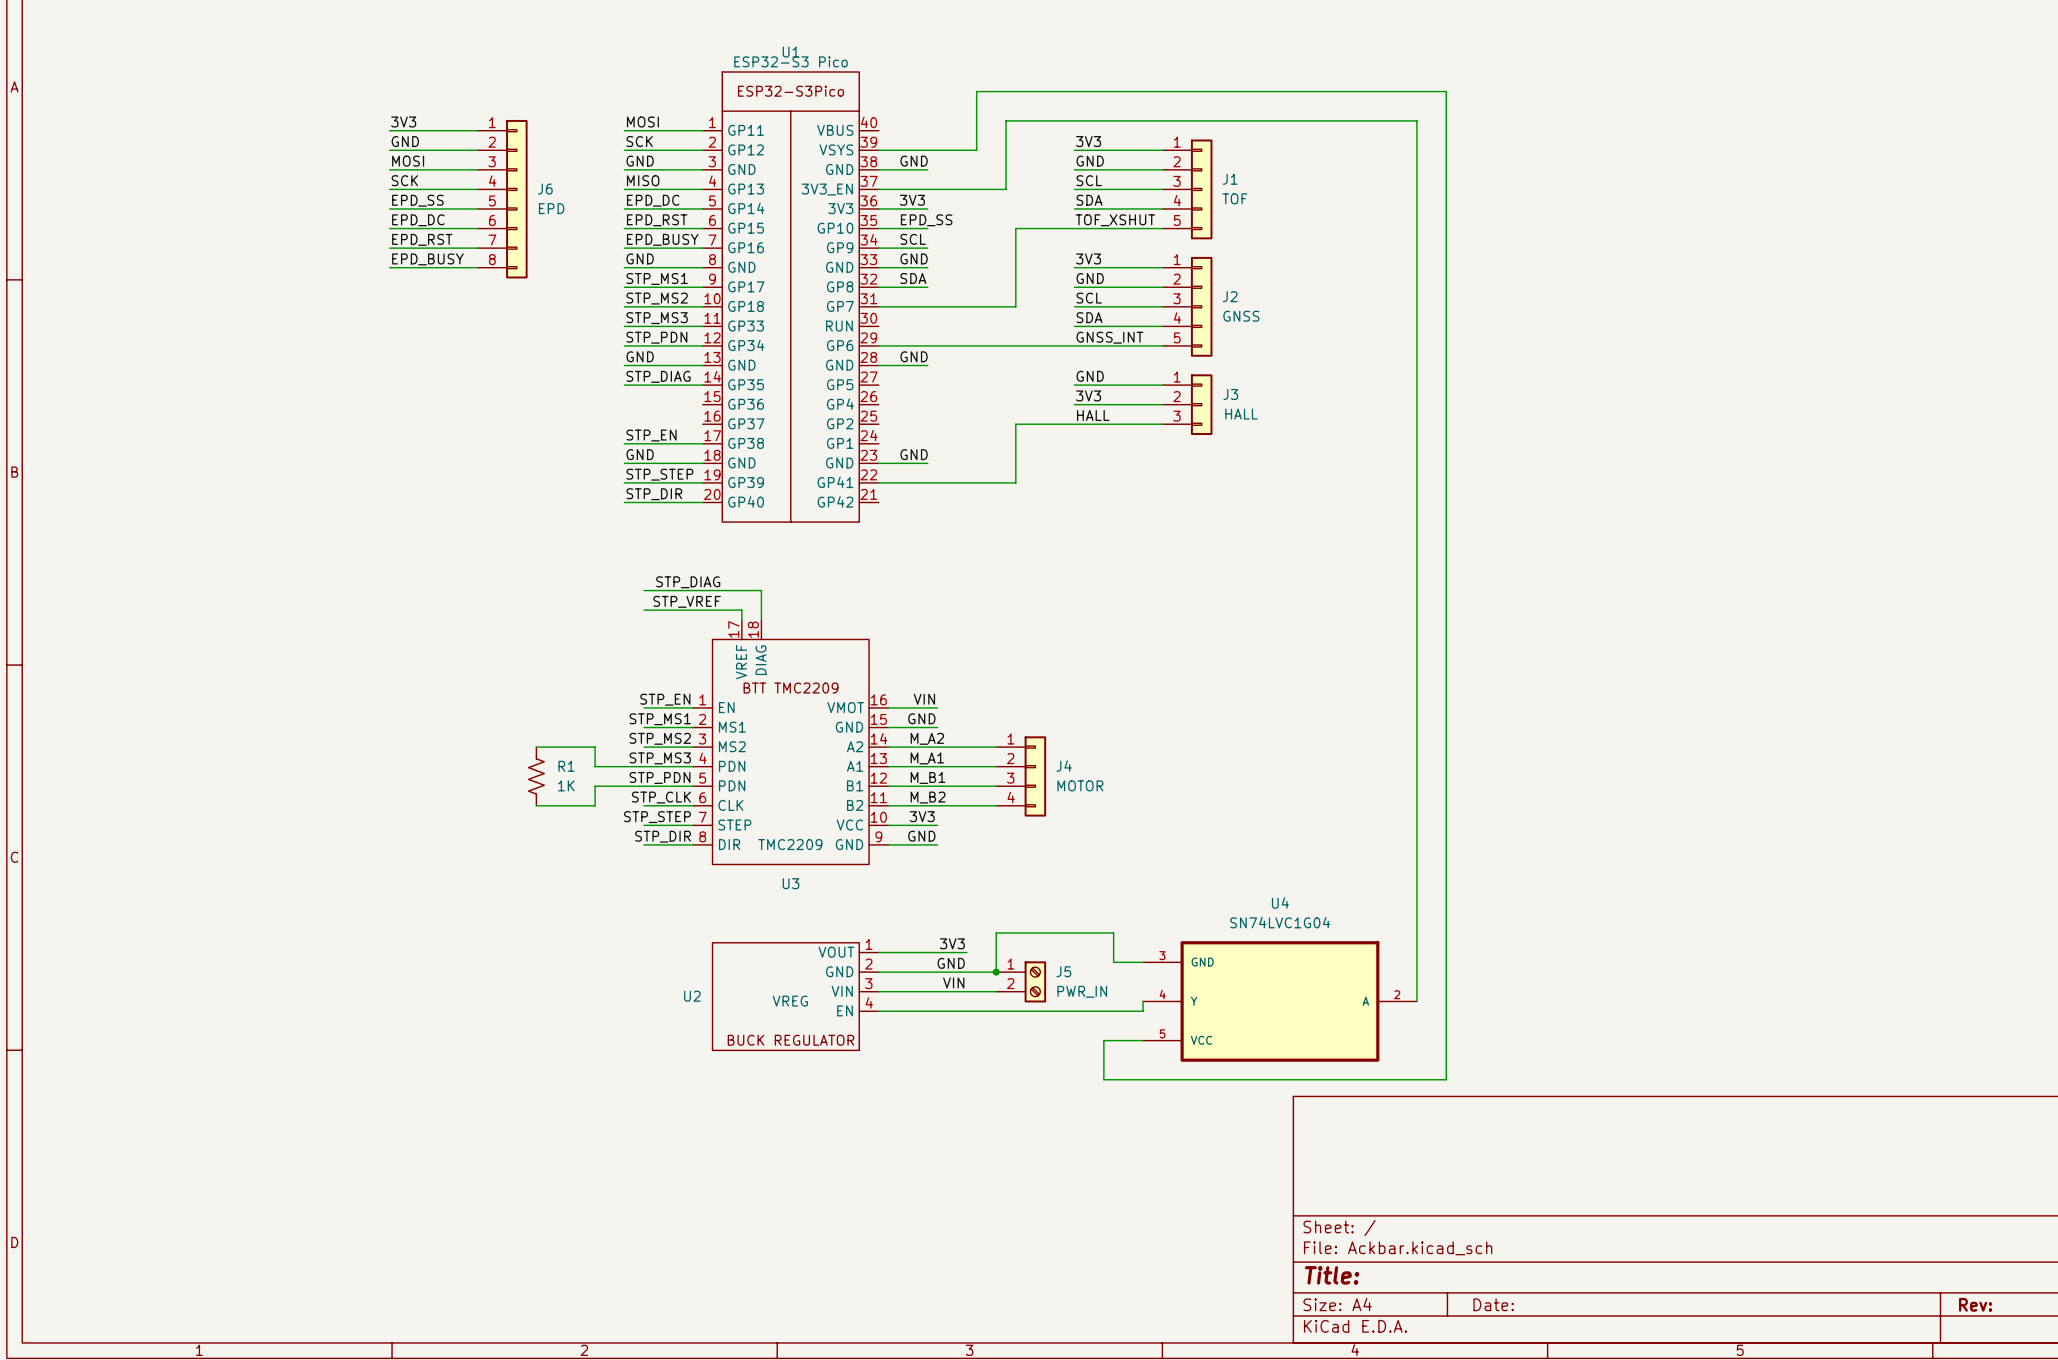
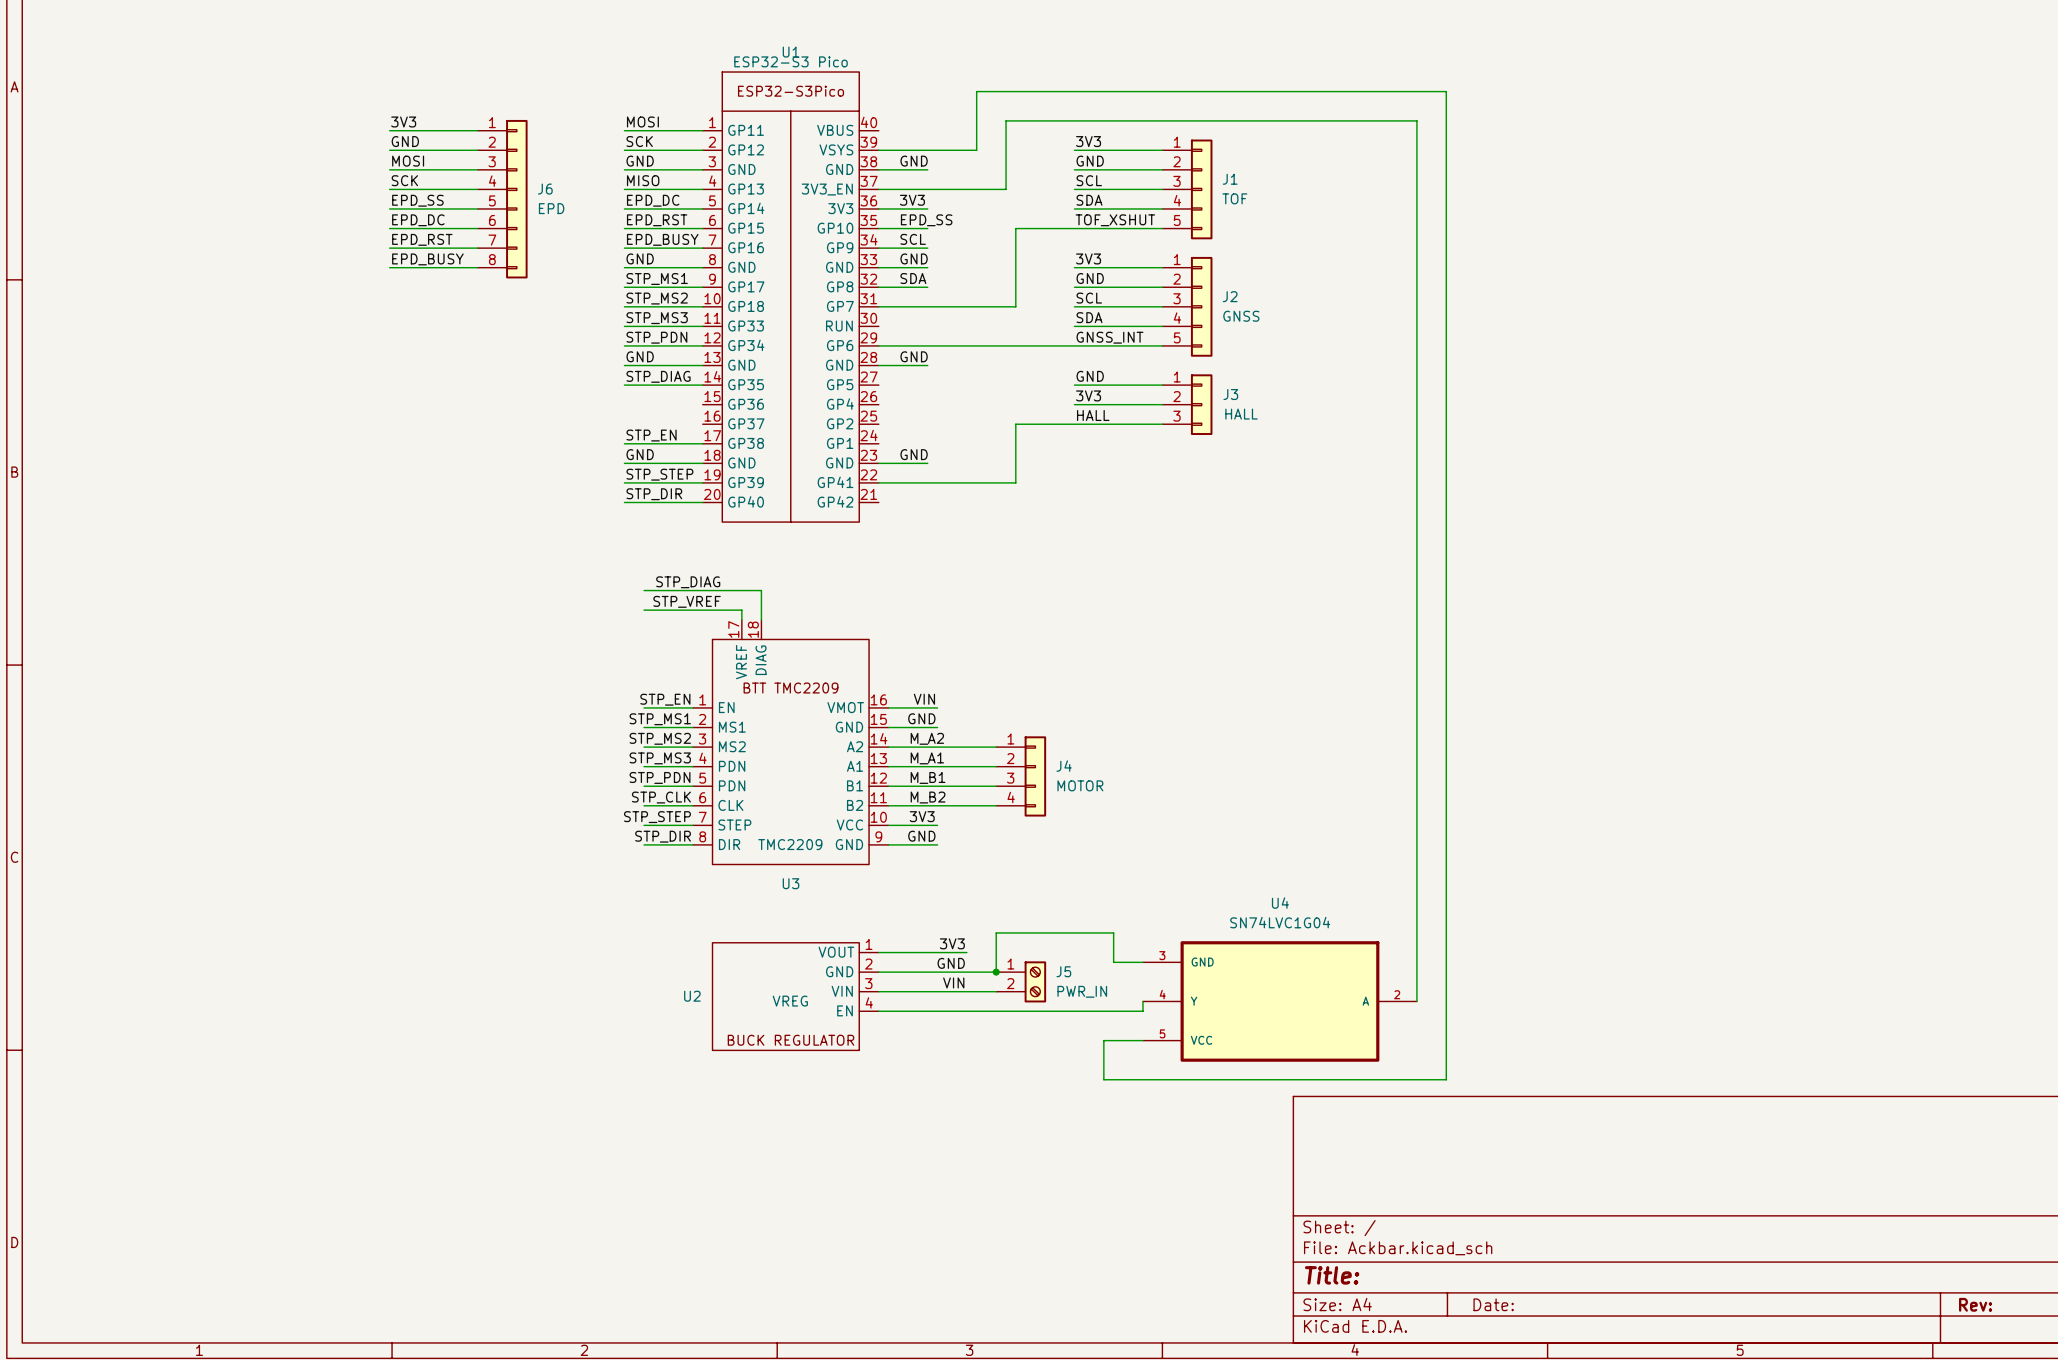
wire: (536, 747) (595, 747) (595, 766) (644, 766) -> none
R1: 1K (536, 776) -> none
wire: (644, 786) (595, 786) (595, 805) (536, 805) -> none

